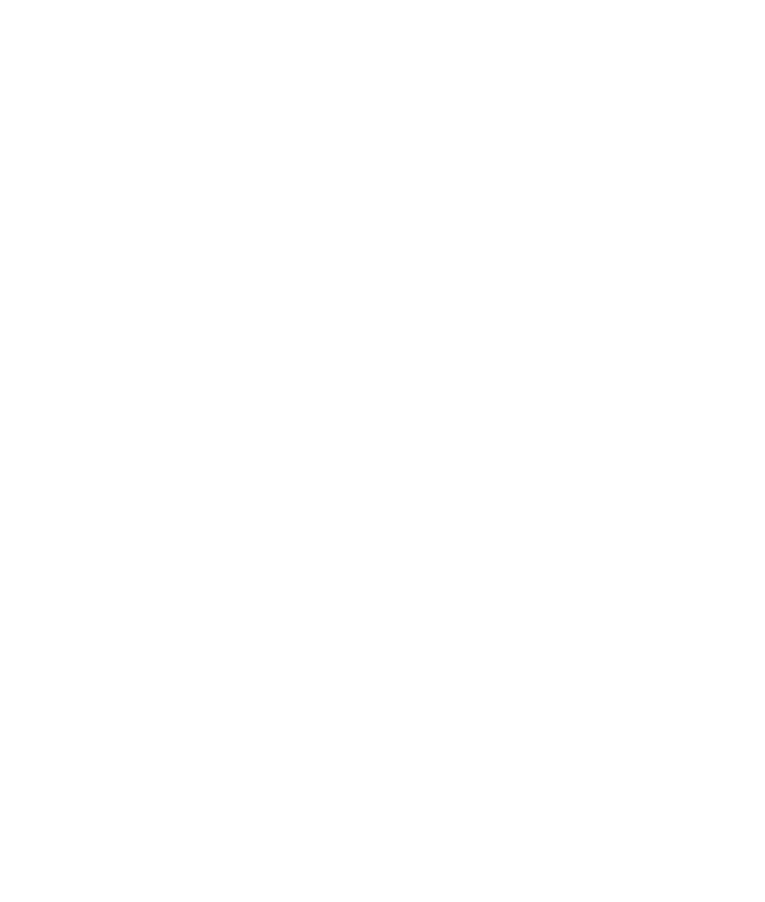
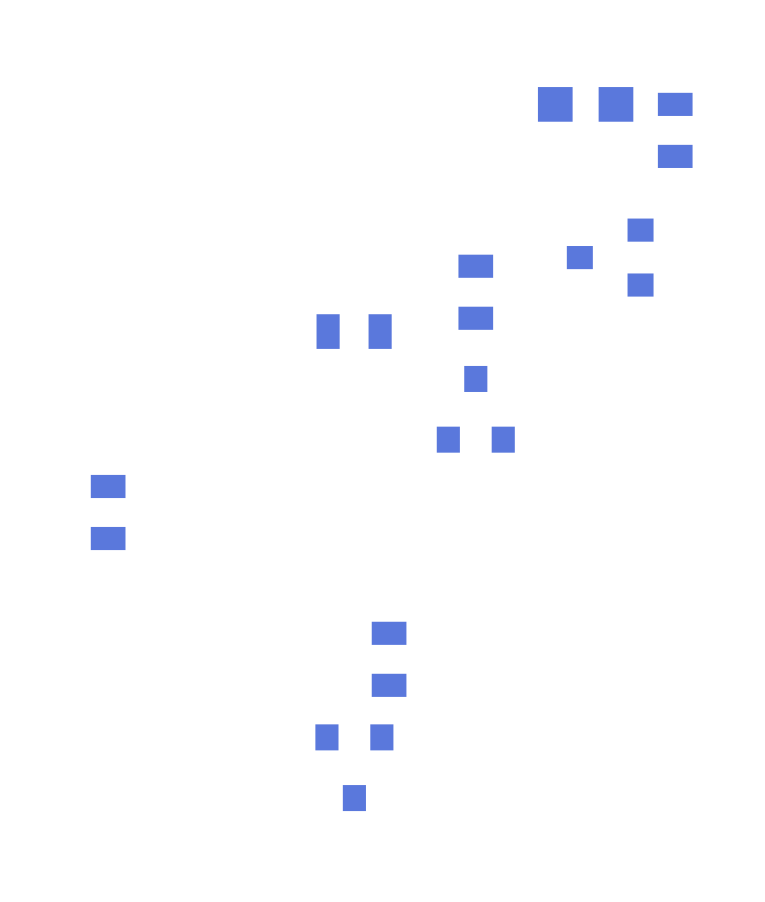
part: none -> (585, 104)
part: none -> (675, 130)
part: none -> (610, 257)
part: none -> (475, 292)
part: none -> (354, 331)
part: none -> (475, 409)
part: none -> (108, 512)
part: none -> (389, 659)
part: none -> (354, 767)

